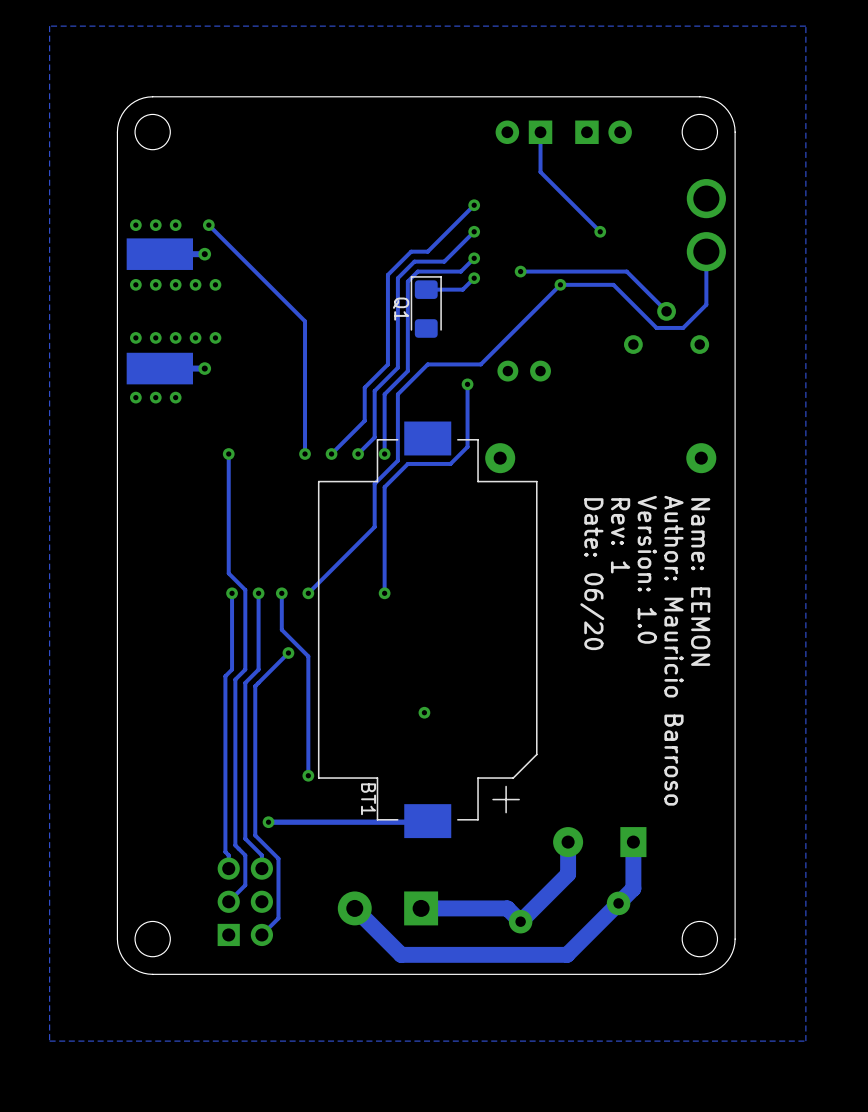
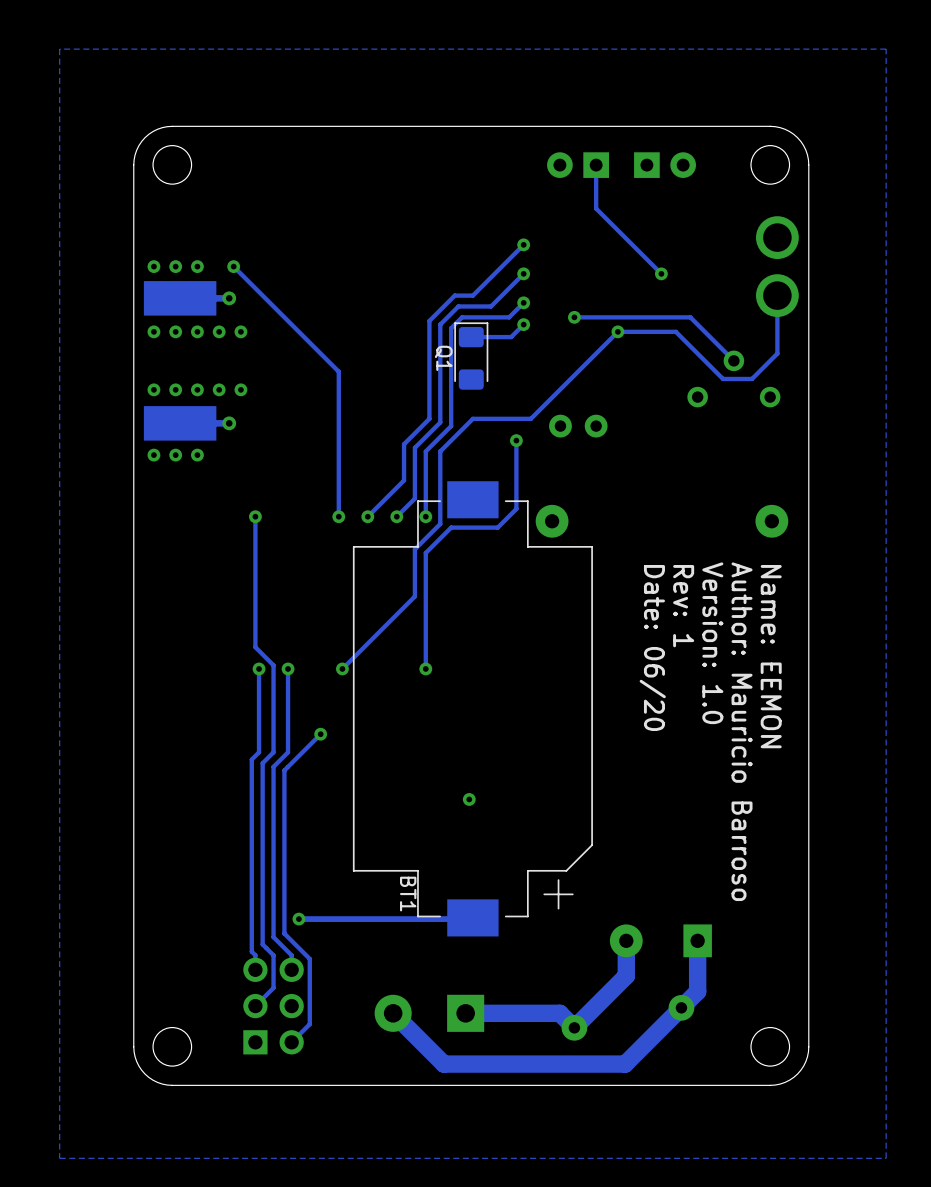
track: (281, 593) (281, 629) (308, 656) (308, 775) -> none
via: (281, 593) -> none
via: (308, 775) -> none

